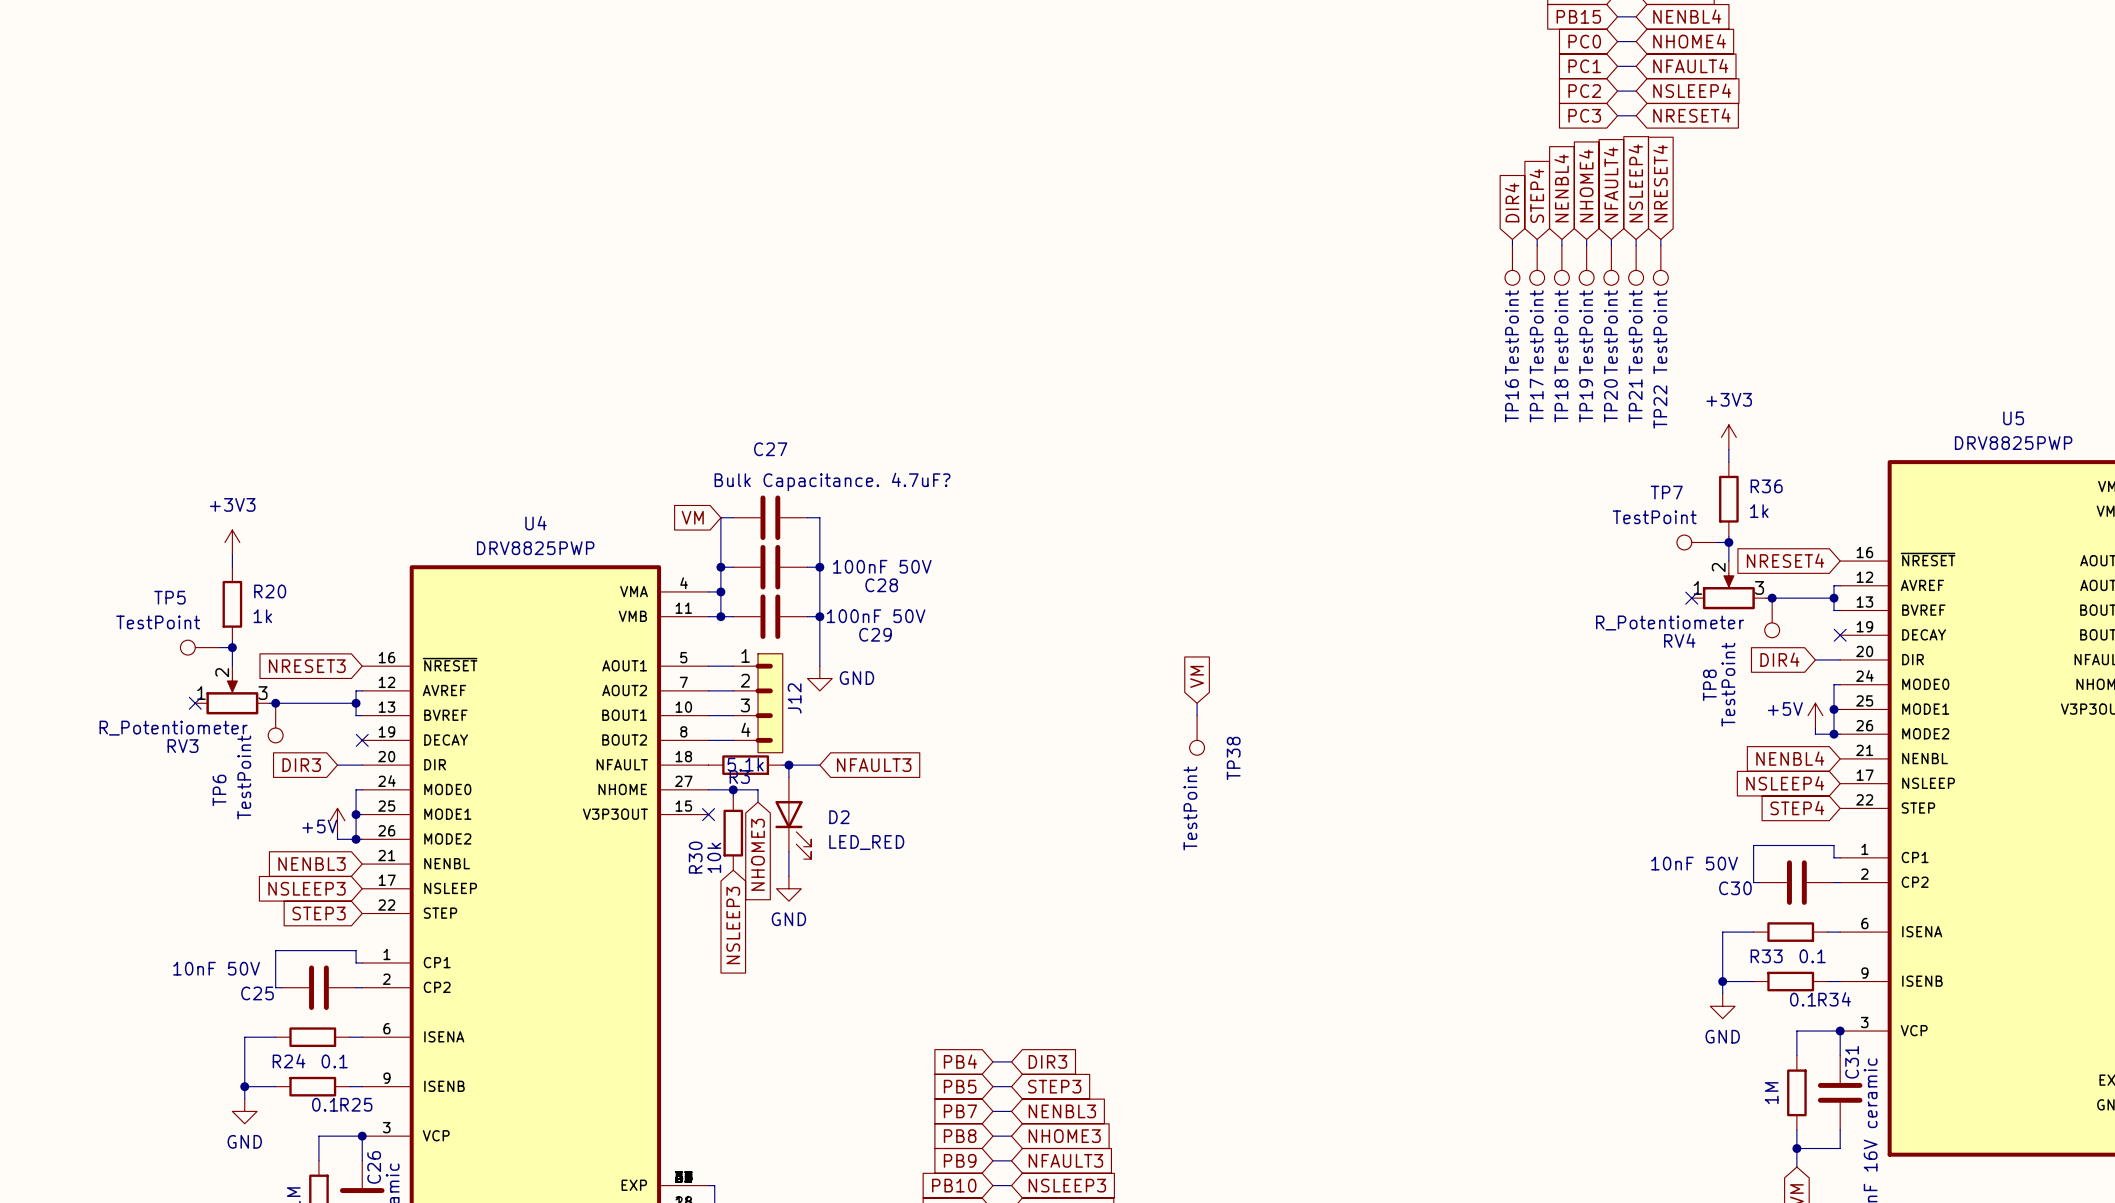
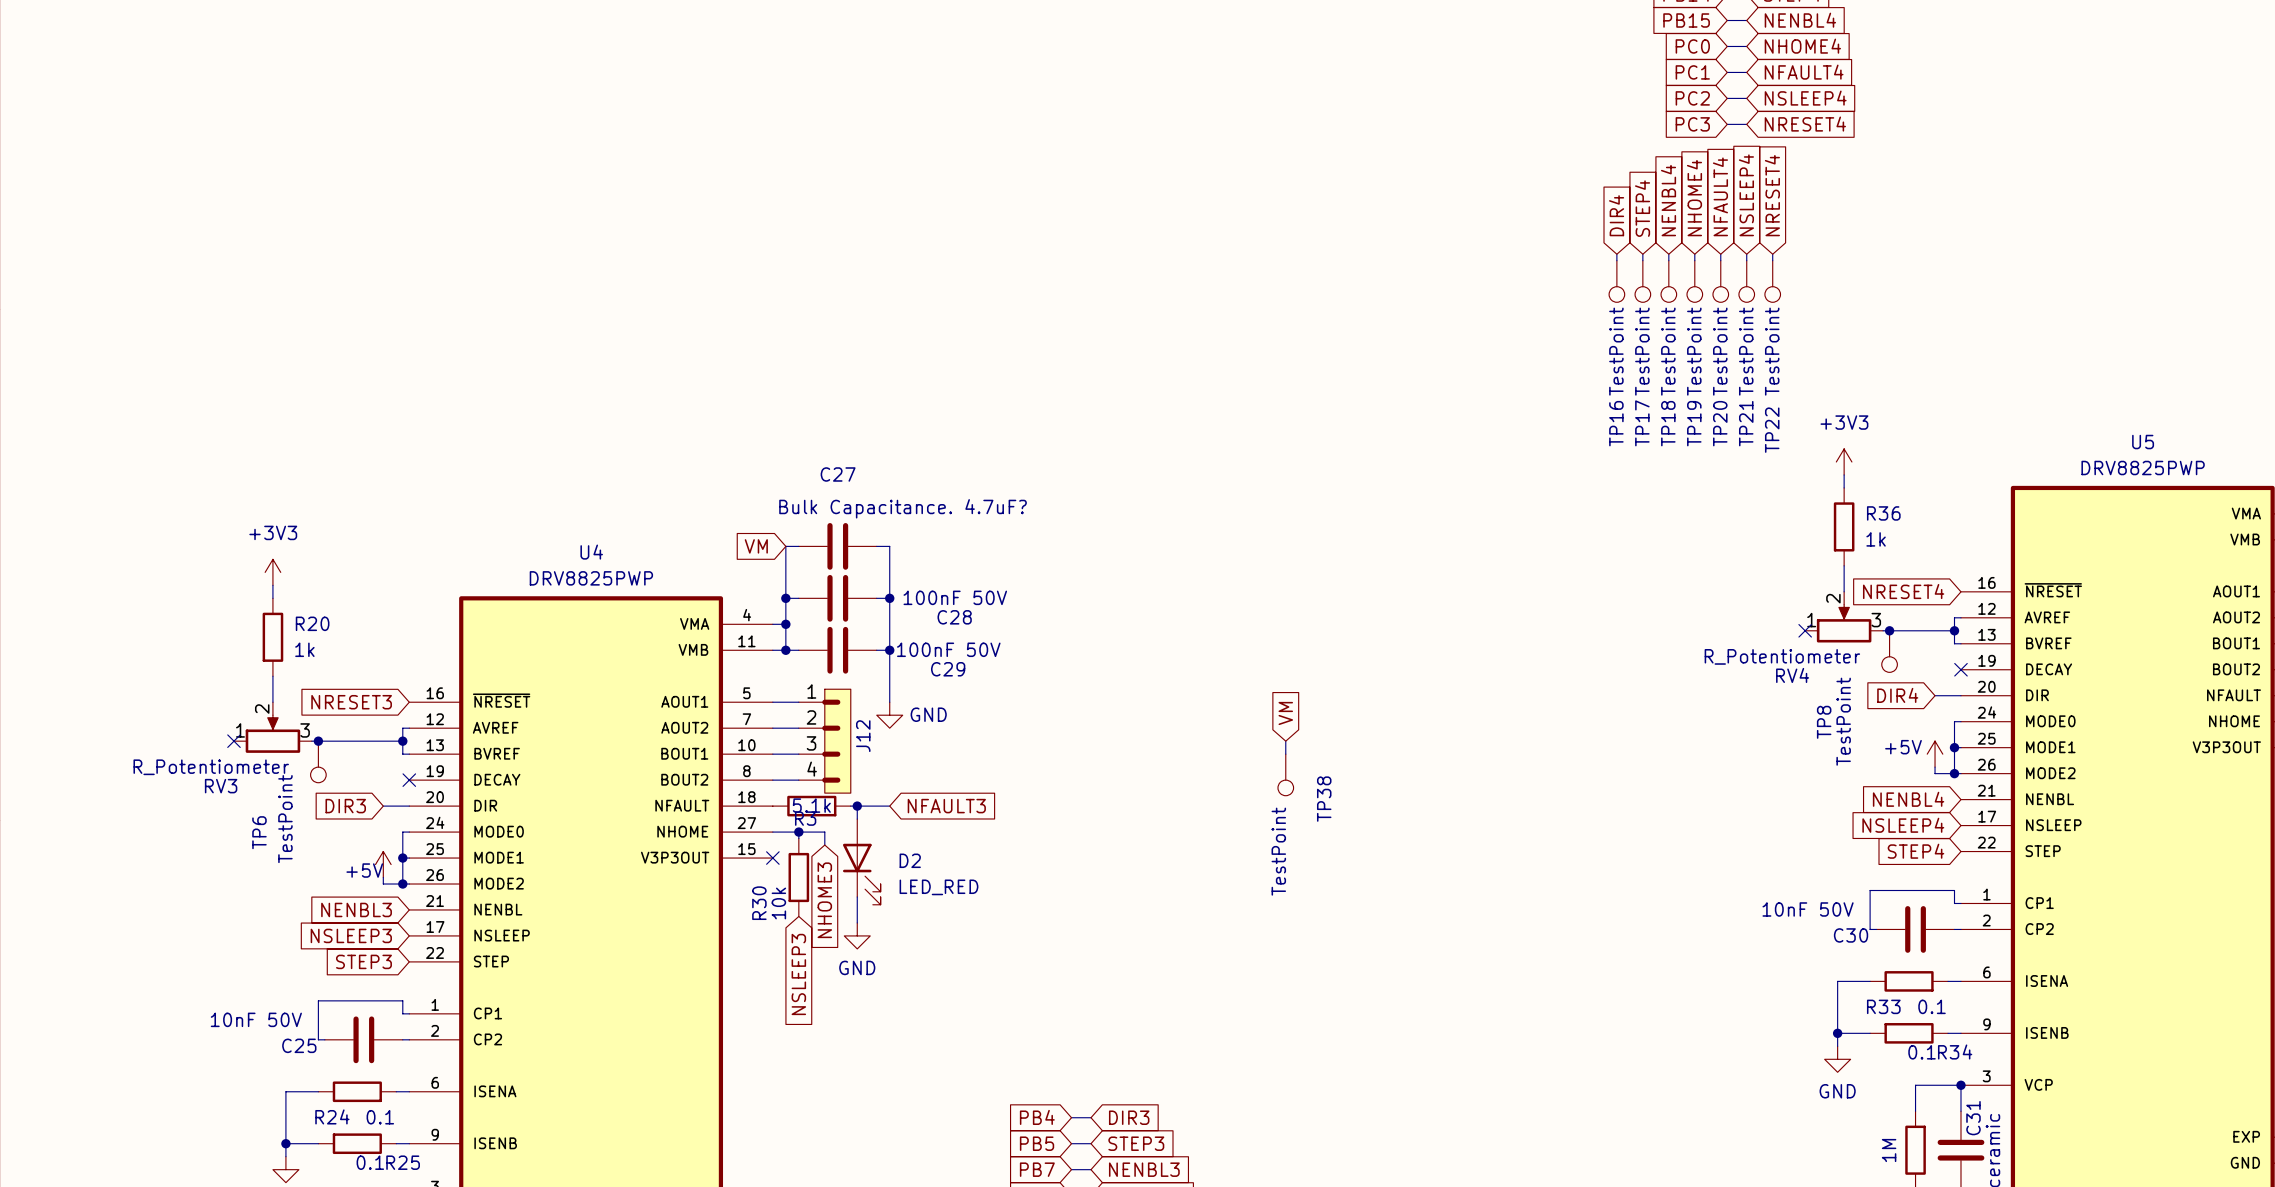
TP7: TestPoint (1696, 542) -> none
wire: (1716, 542) (1728, 542) -> none
junction: (1728, 542) -> none
TP5: TestPoint (200, 647) -> none
wire: (220, 647) (232, 647) -> none
junction: (232, 647) -> none

